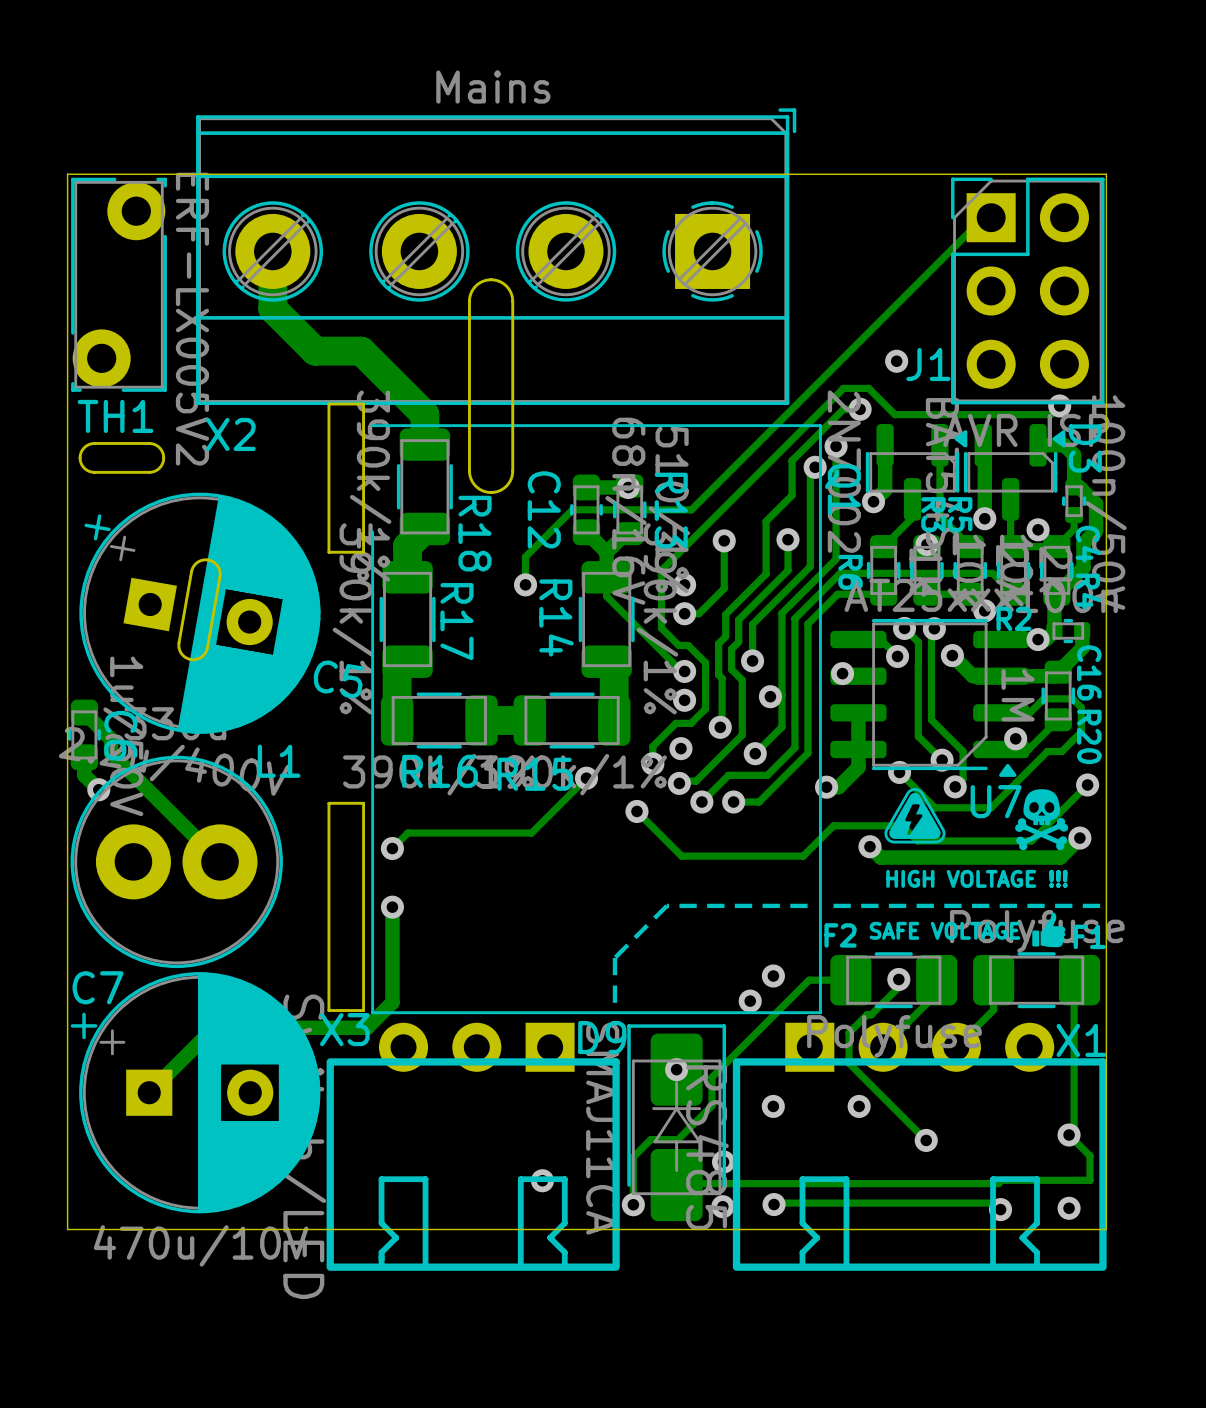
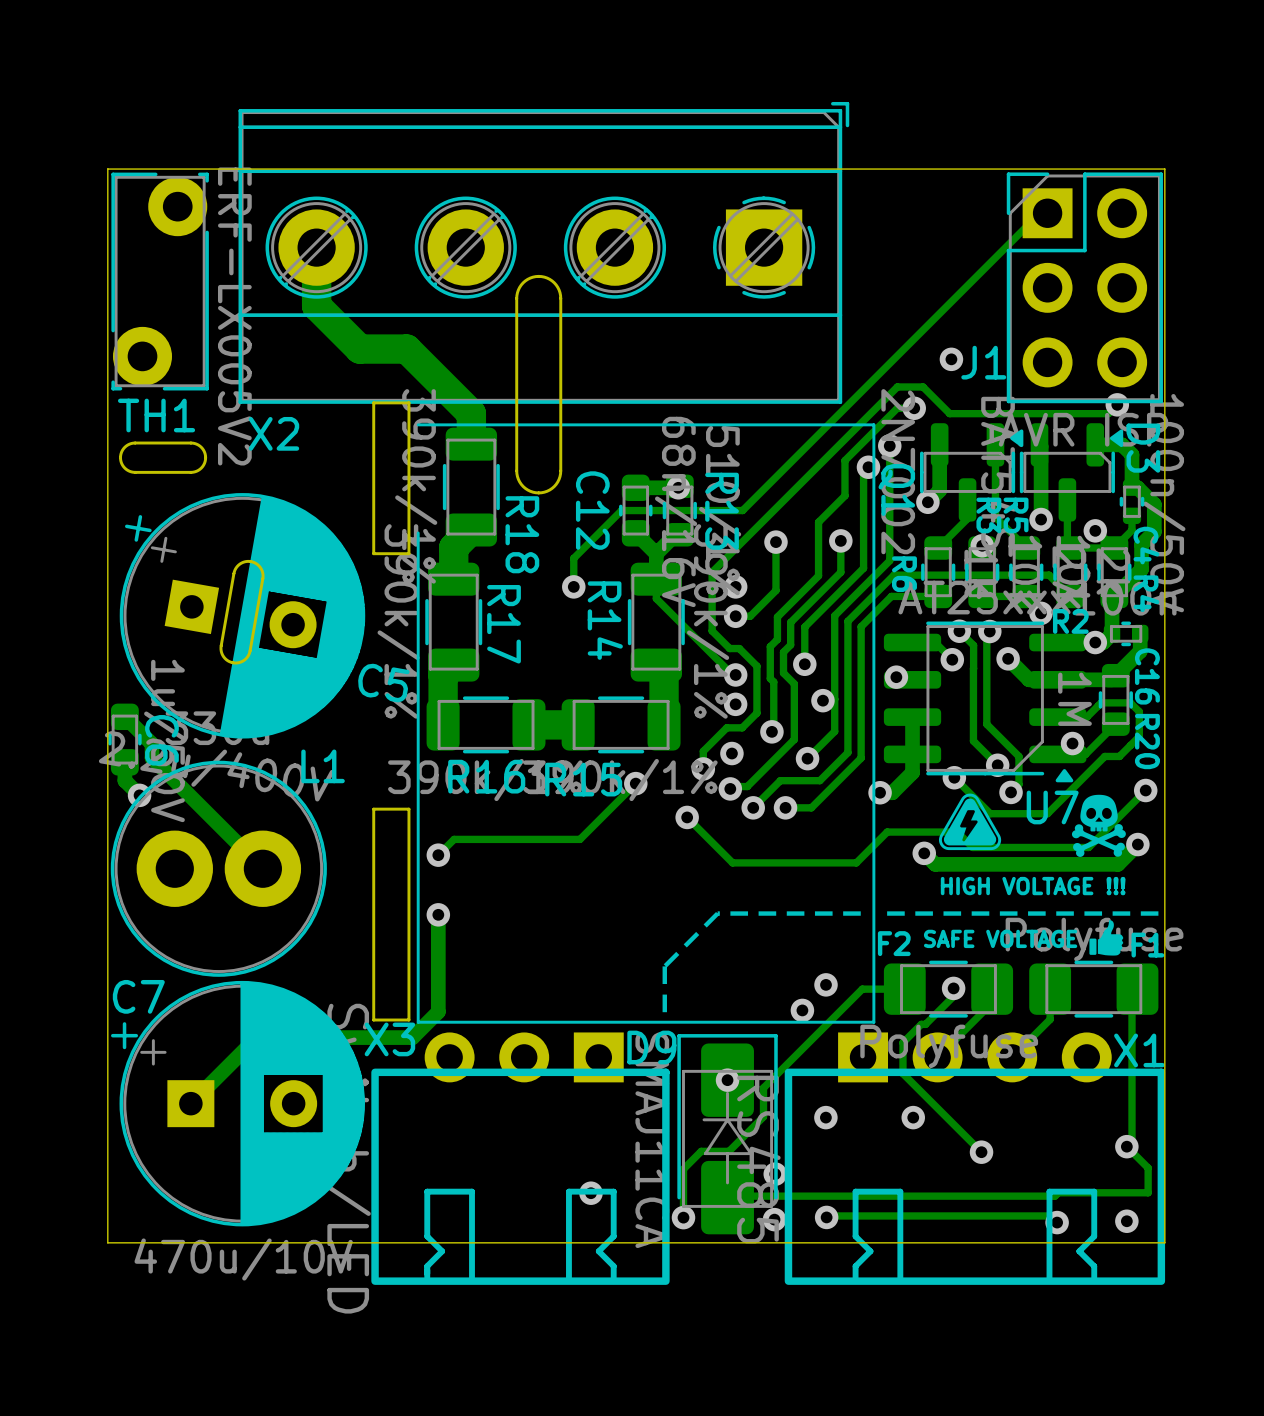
X2 value: Mains (493, 87) -> none

